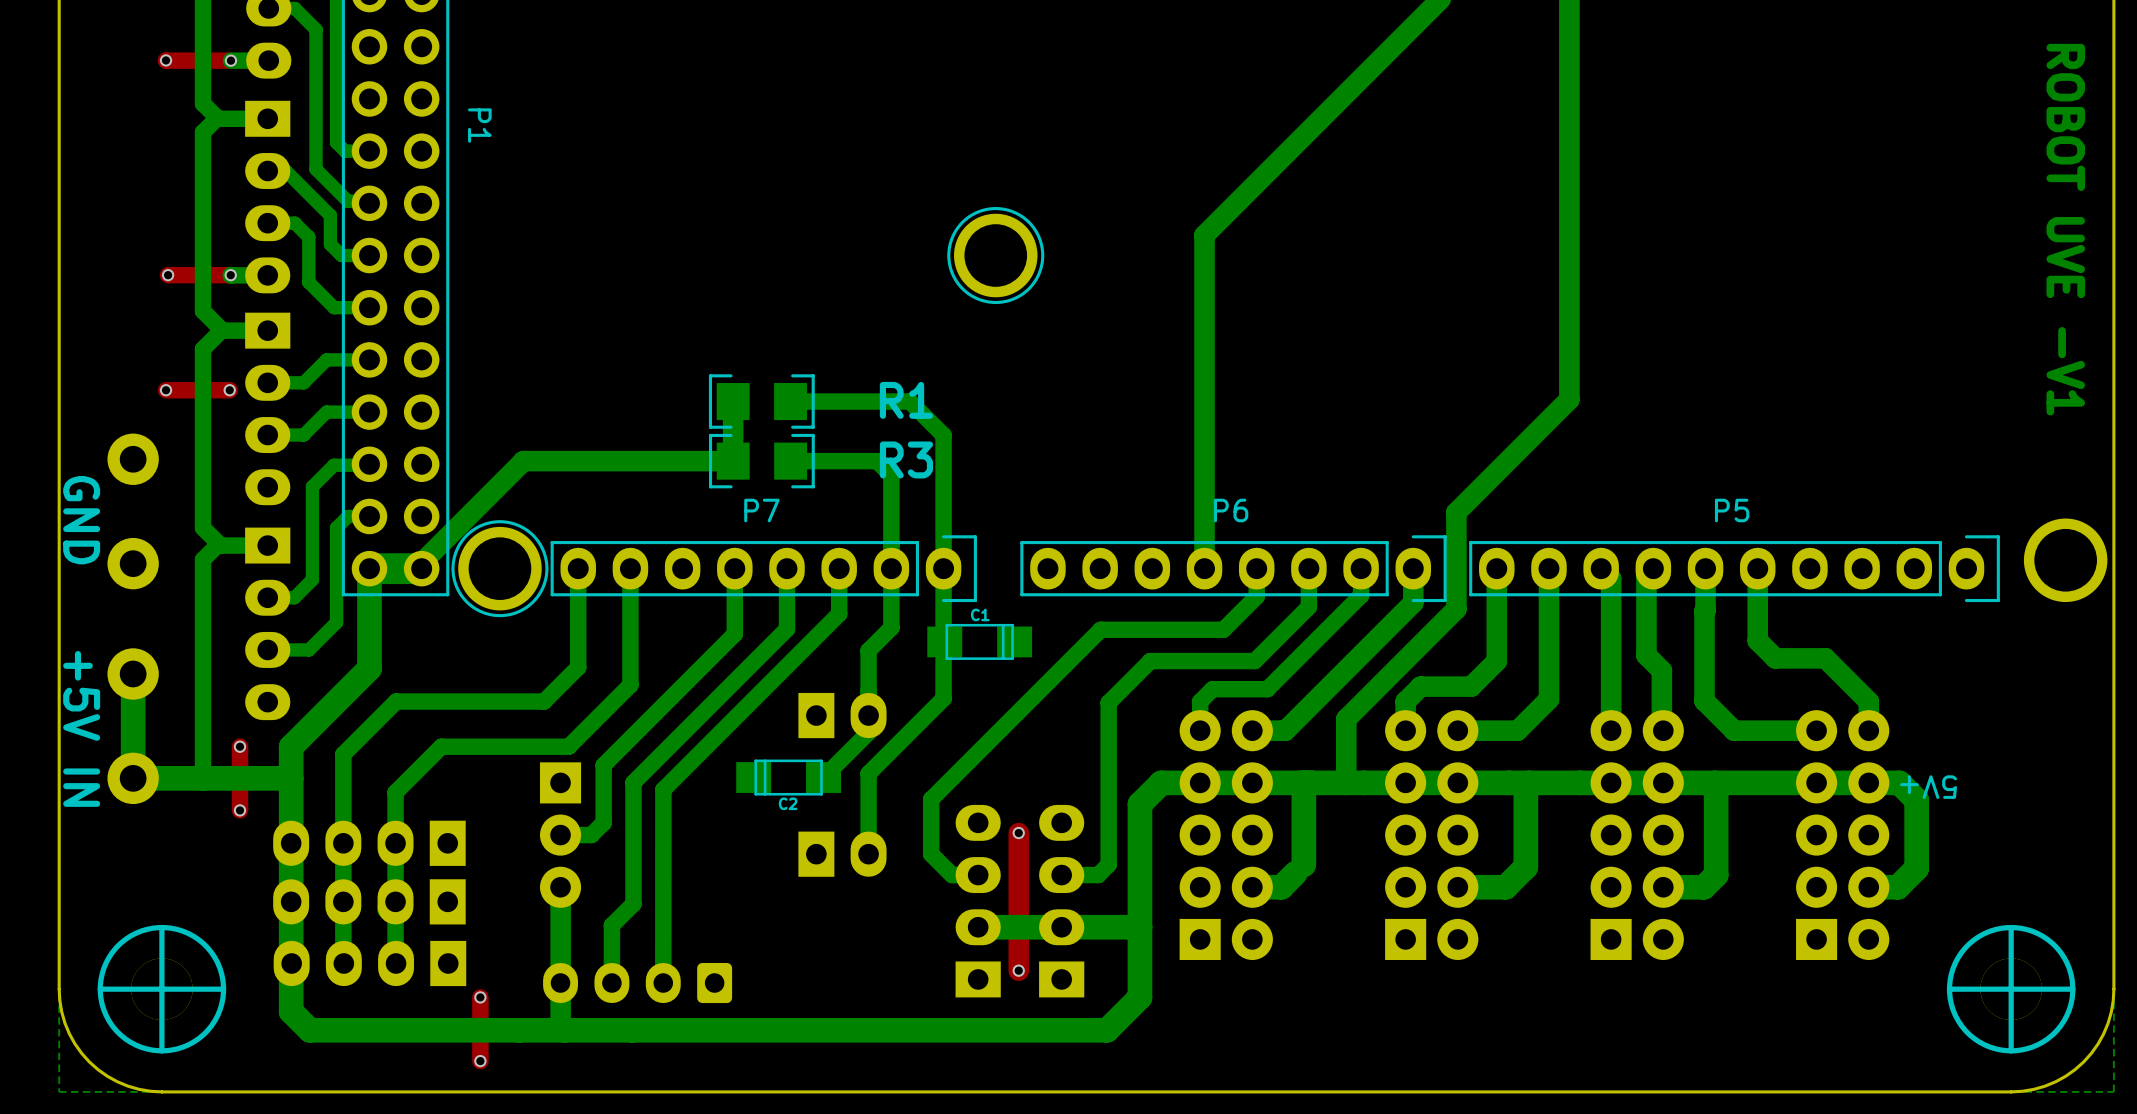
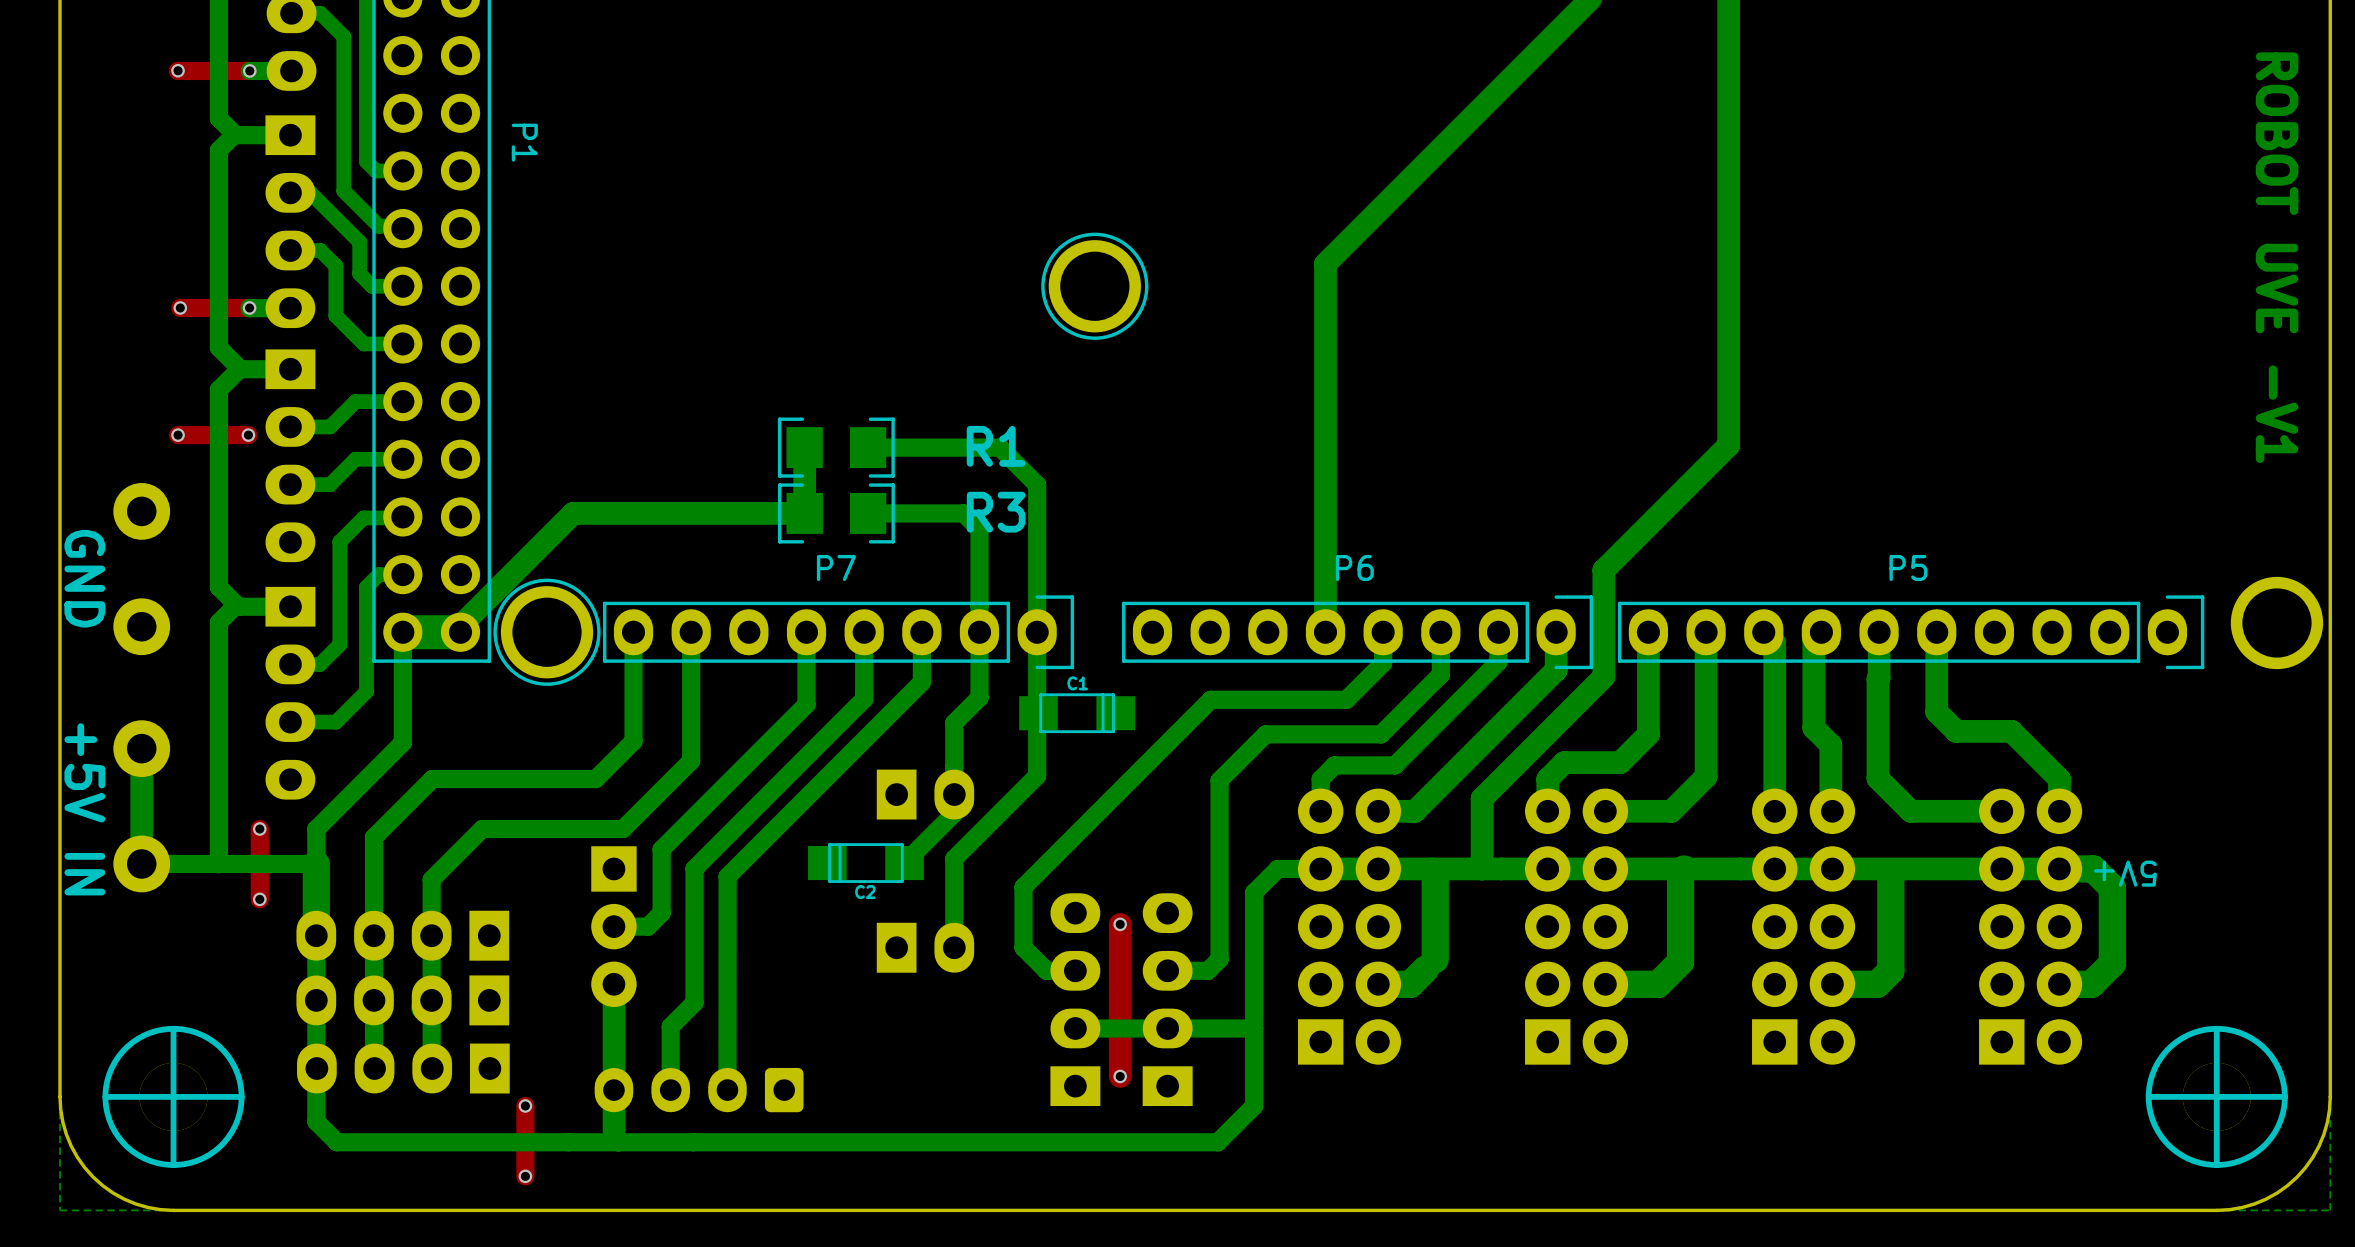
bottom track width: thick (369, 568) (369, 668) (291, 746) (291, 778) (133, 778) (133, 673) -> thin (402, 632) (402, 742) (316, 829) (316, 863) (141, 863) (141, 748)
bottom track width: thick (1867, 782) (1161, 782) (1139, 804) (1139, 997) (1107, 1030) (309, 1030) (291, 1011) (291, 843) -> thin (2058, 868) (1277, 868) (1254, 892) (1254, 1105) (1217, 1142) (336, 1142) (316, 1121) (316, 935)
bottom track width: thick (1139, 927) (978, 927) -> thin (1254, 1028) (1075, 1028)

